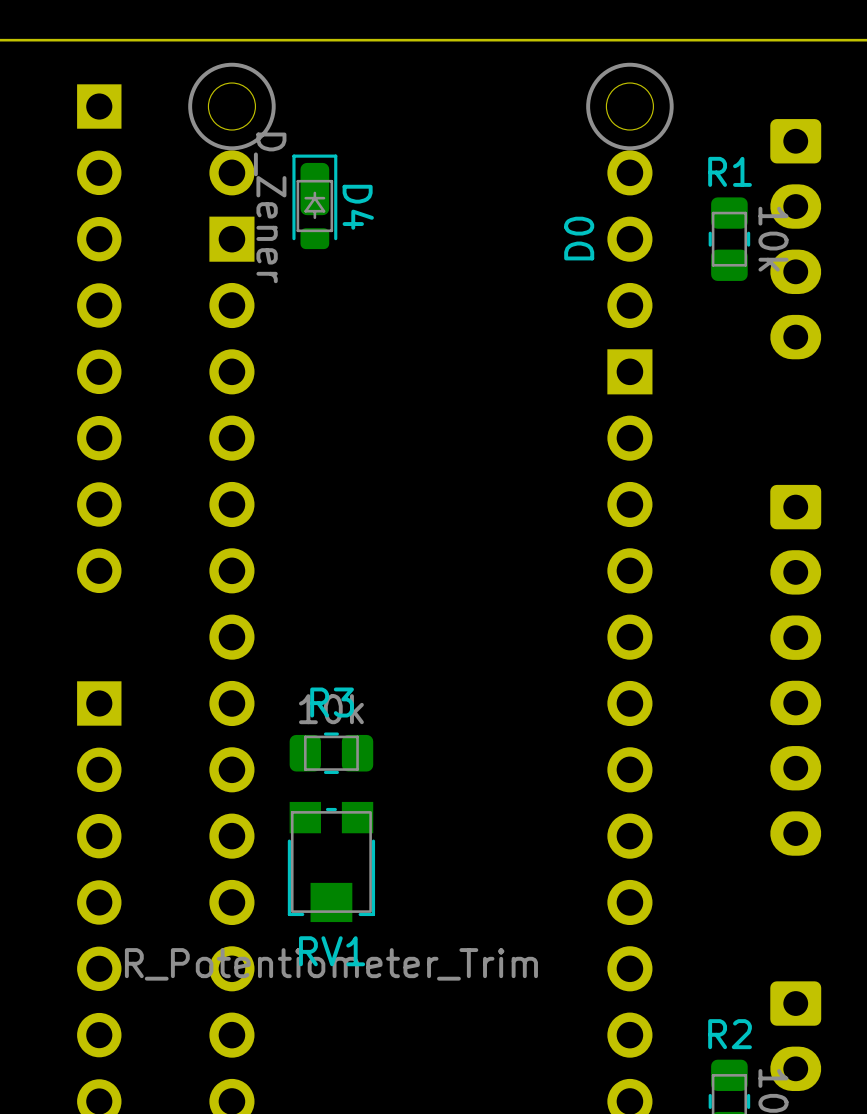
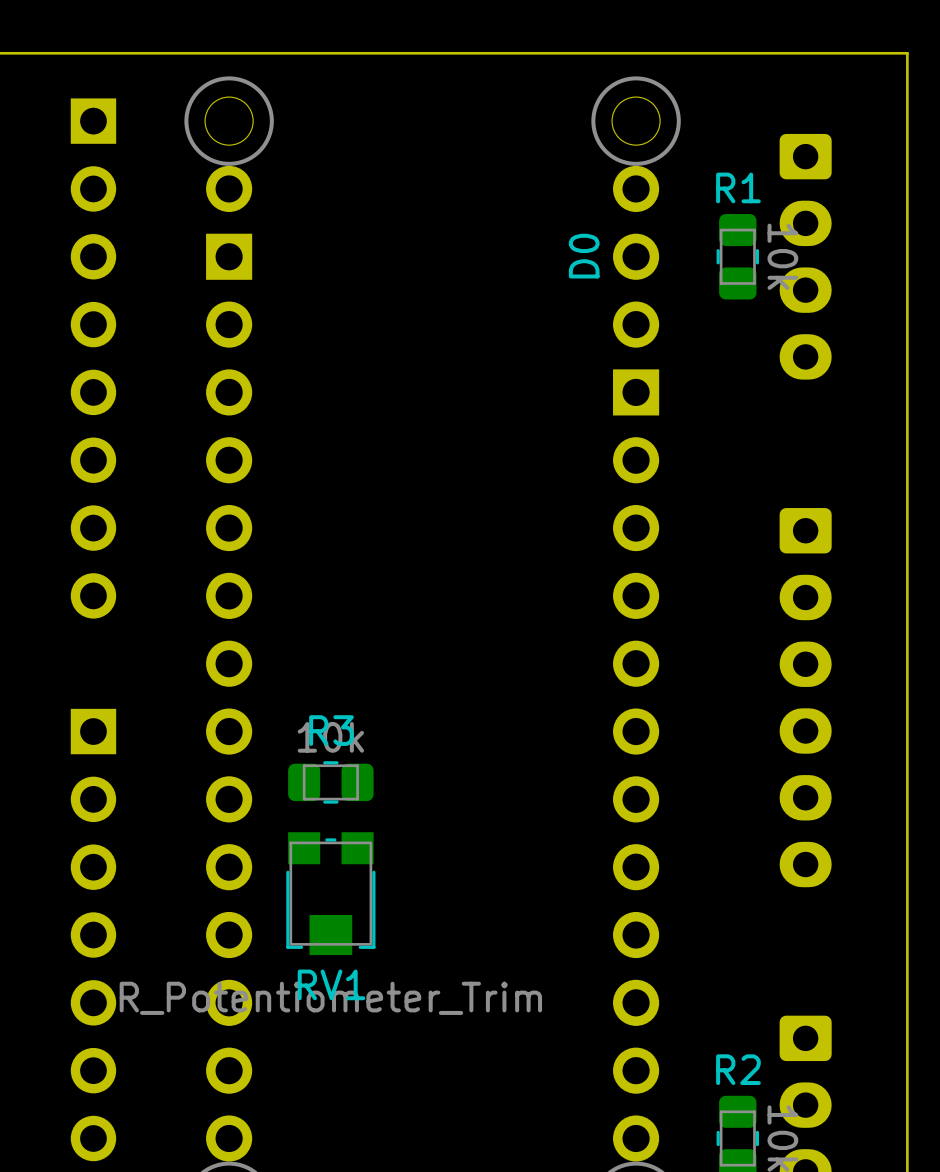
D4: D_Zener (314, 201) -> none

